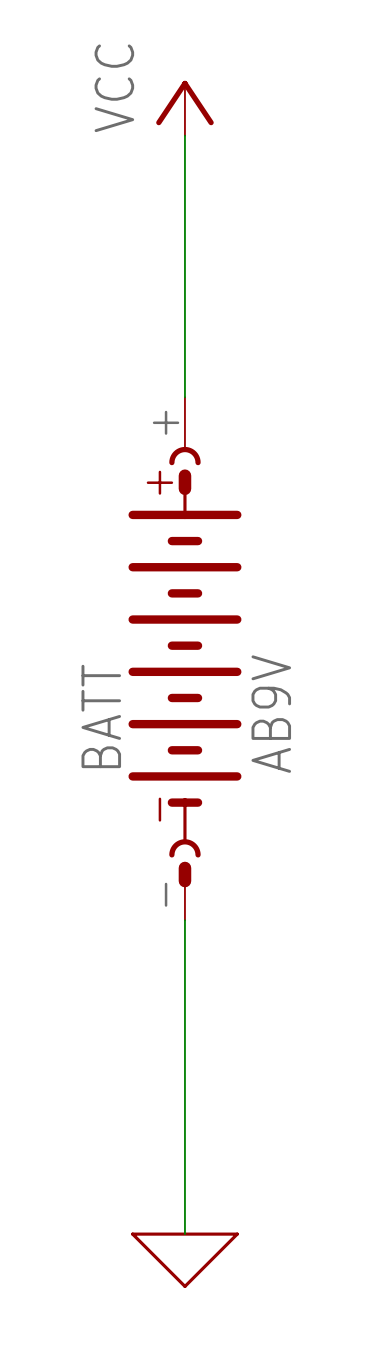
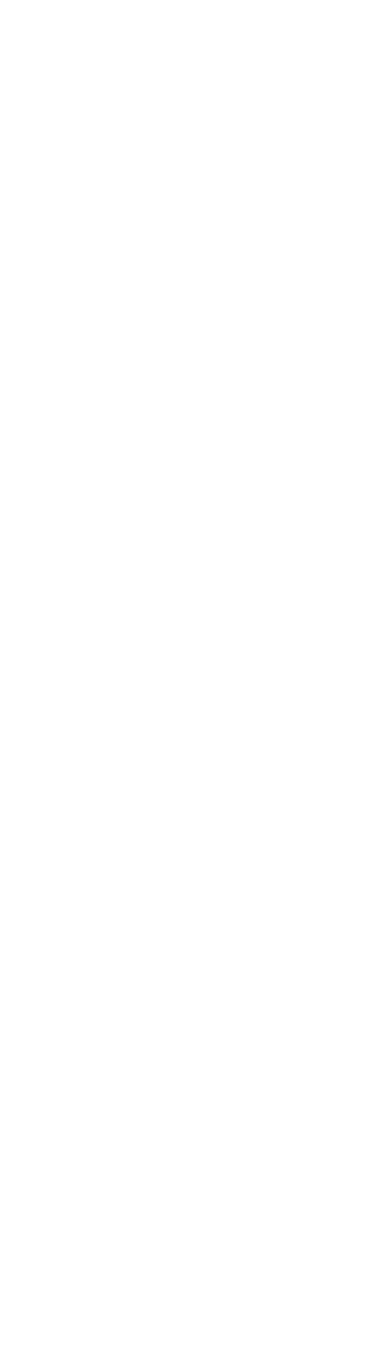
power symbol: VCC (184, 108) -> none
wire: (184, 135) (184, 397) -> none
BATT: AB9V (184, 658) -> none
wire: (184, 920) (184, 1234) -> none
power symbol: (184, 1260) -> none

